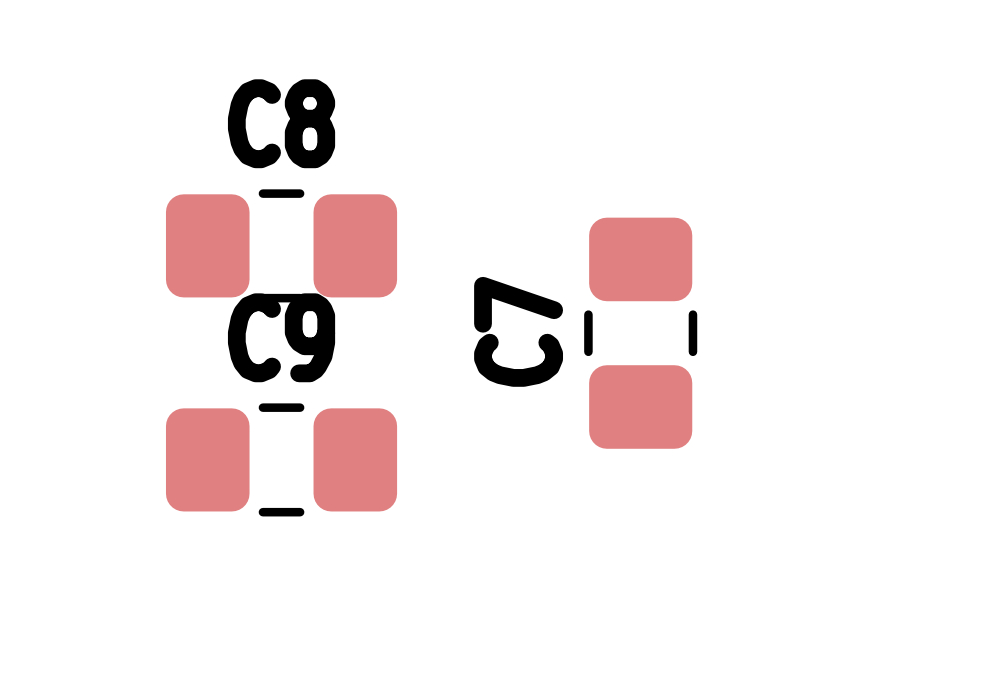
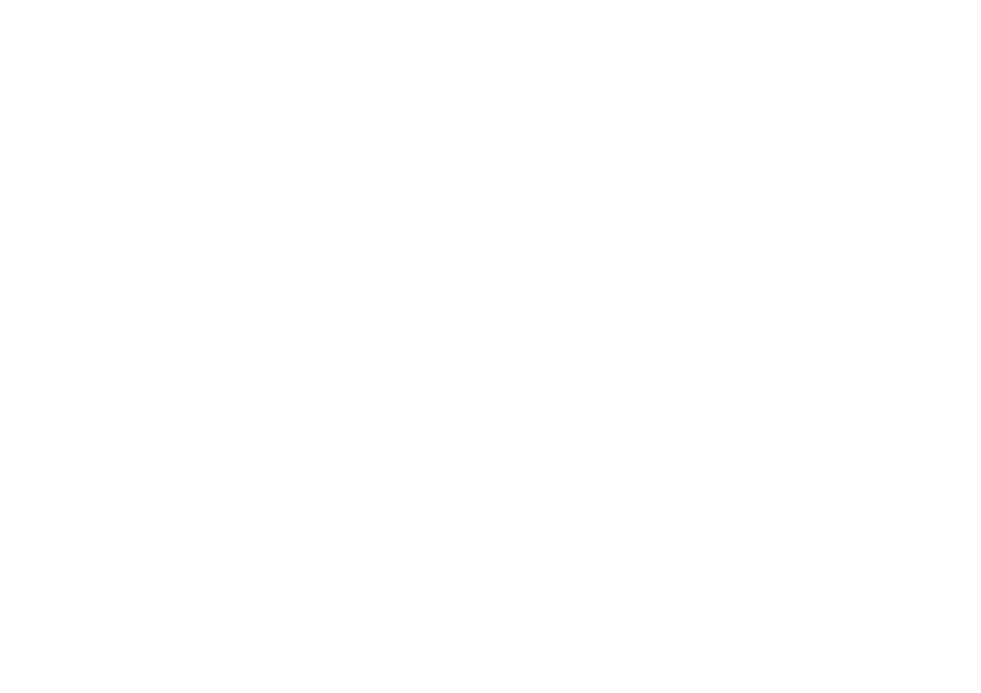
C8: (281, 245) -> none
C7: (640, 333) -> none
C9: (281, 459) -> none

